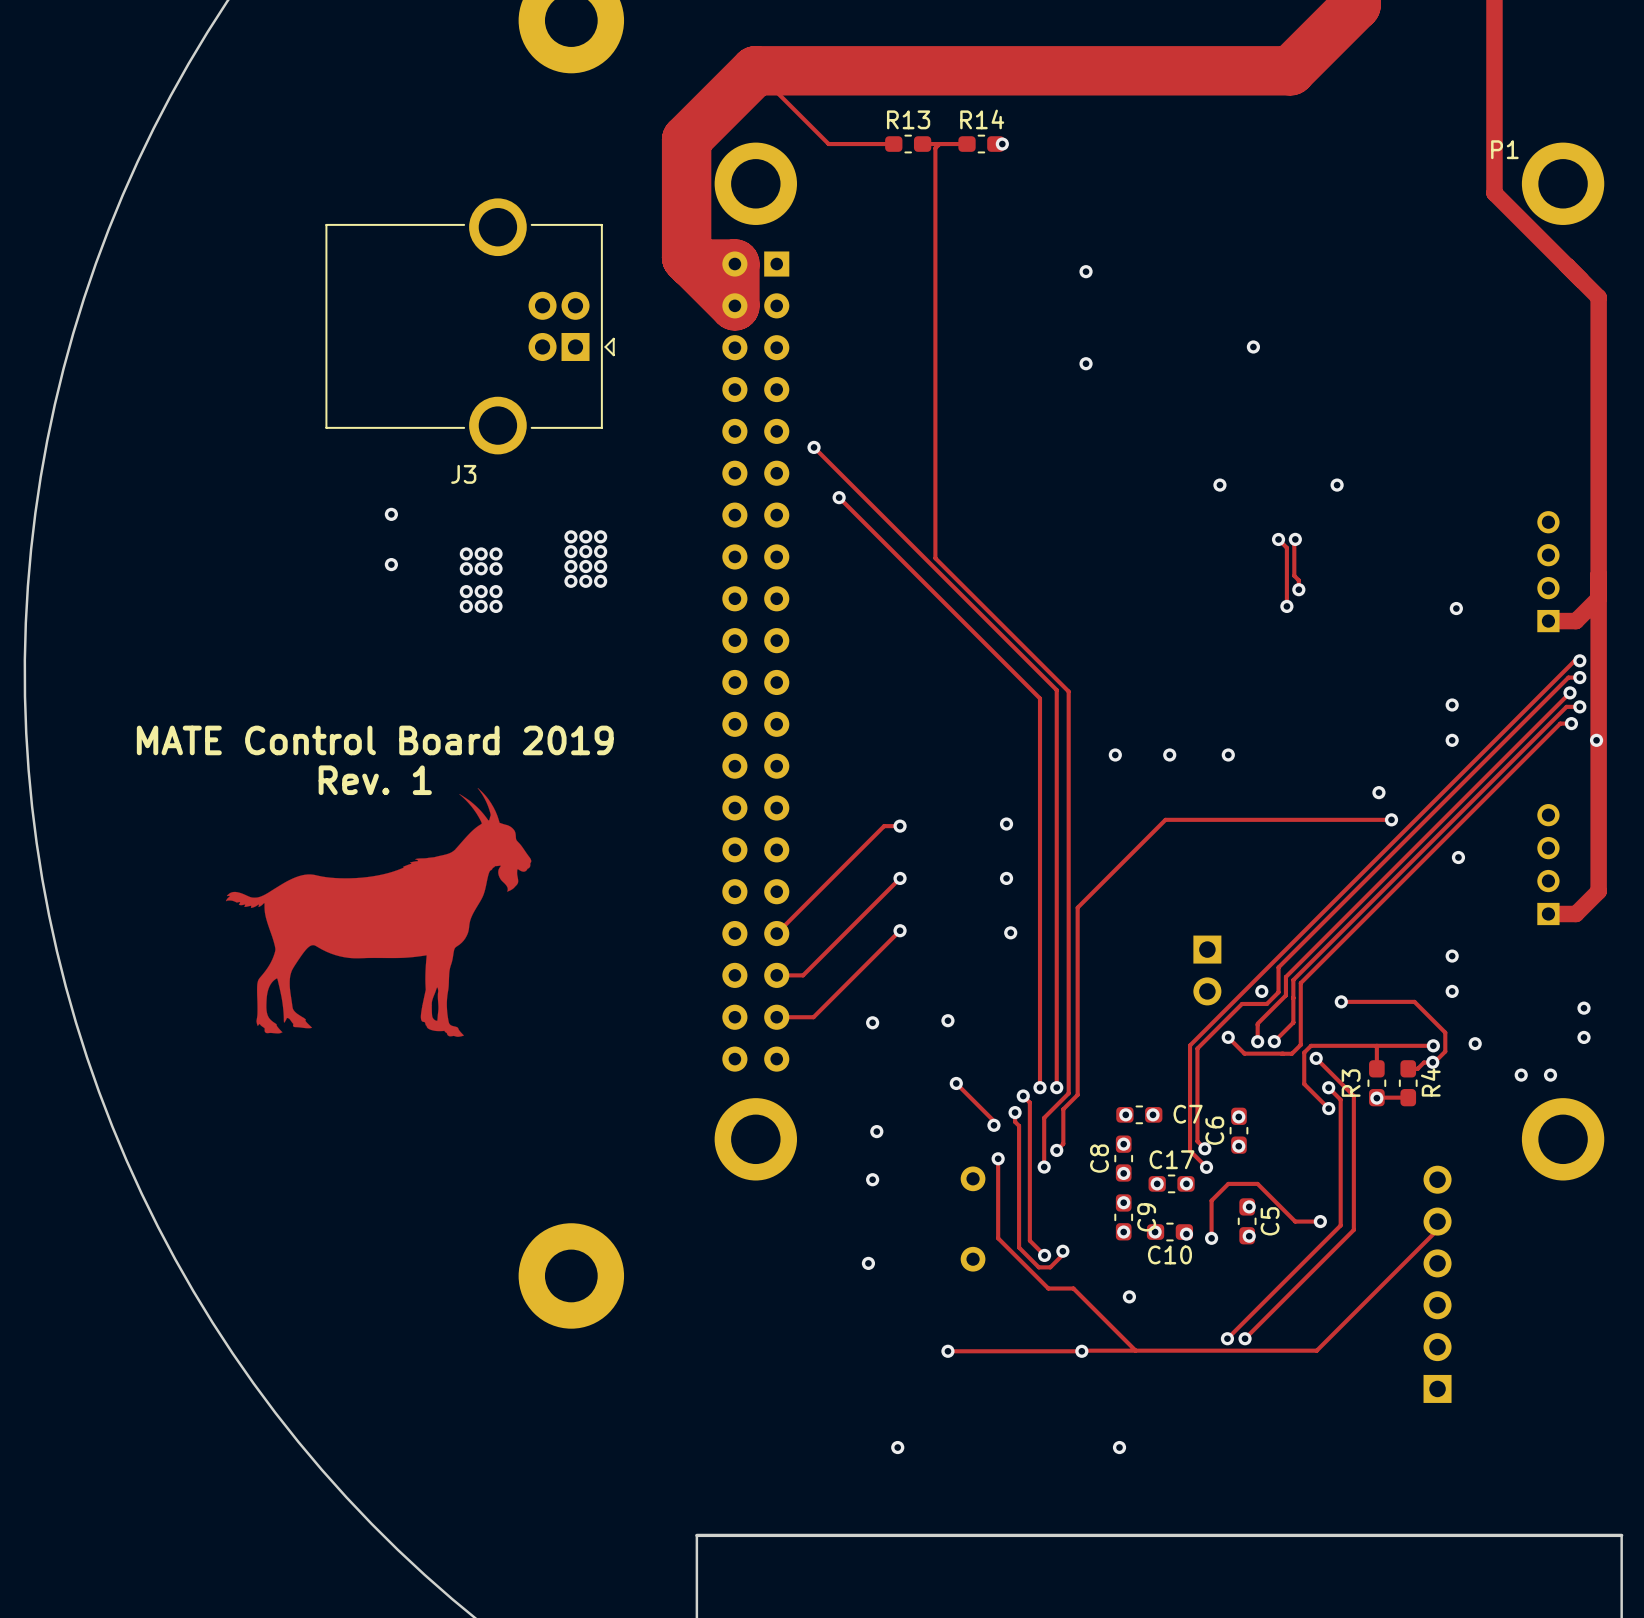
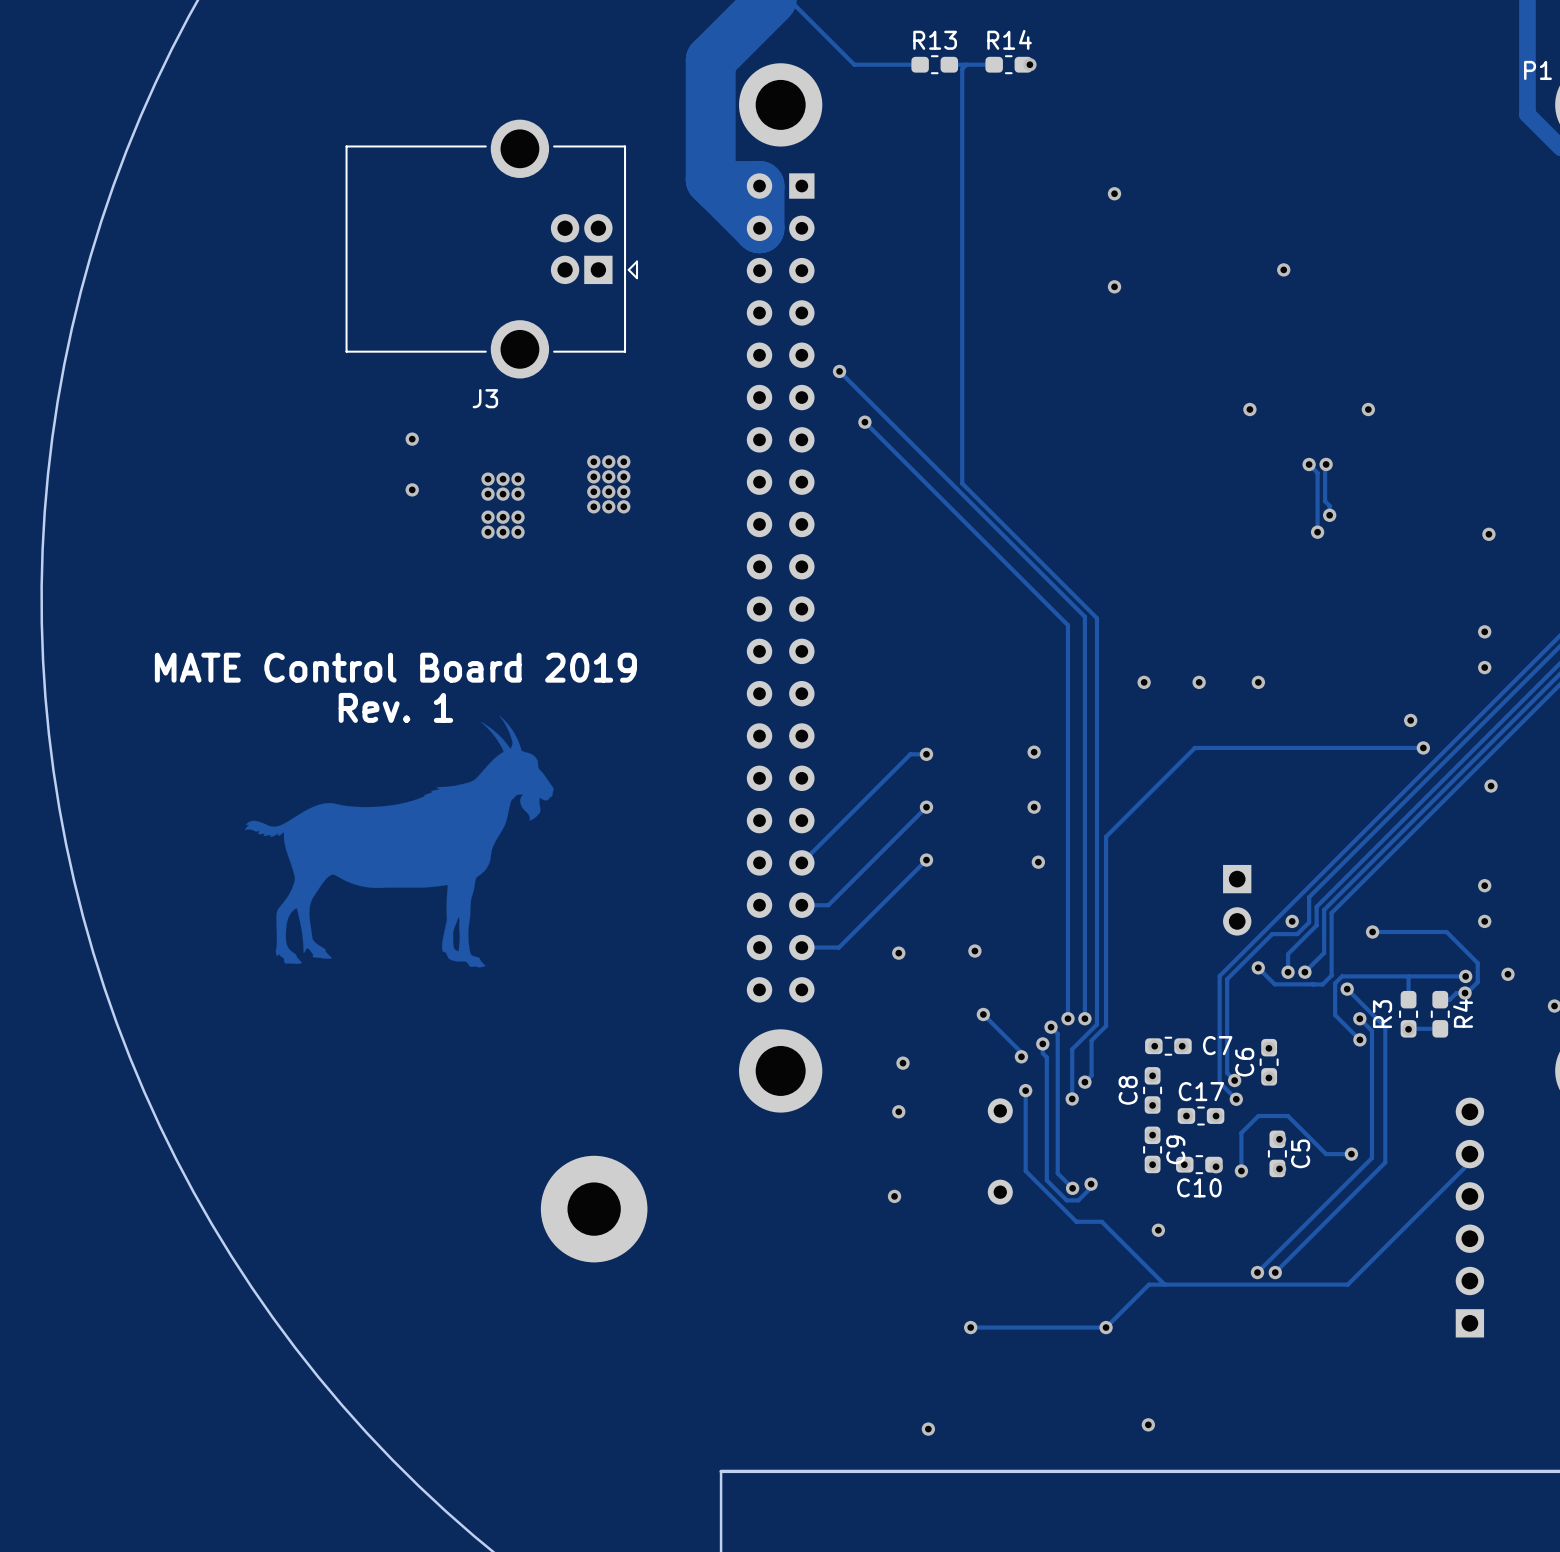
track: (1120, 1350) (947, 1351) -> (1148, 1284) (1106, 1327) (970, 1327)
via: (947, 1351) -> none
via: (1081, 1351) -> none
via: none -> (970, 1327)
via: none -> (1106, 1327)
via: (897, 1447) -> none
via: (1119, 1447) -> none
via: none -> (1148, 1424)
via: none -> (928, 1429)

